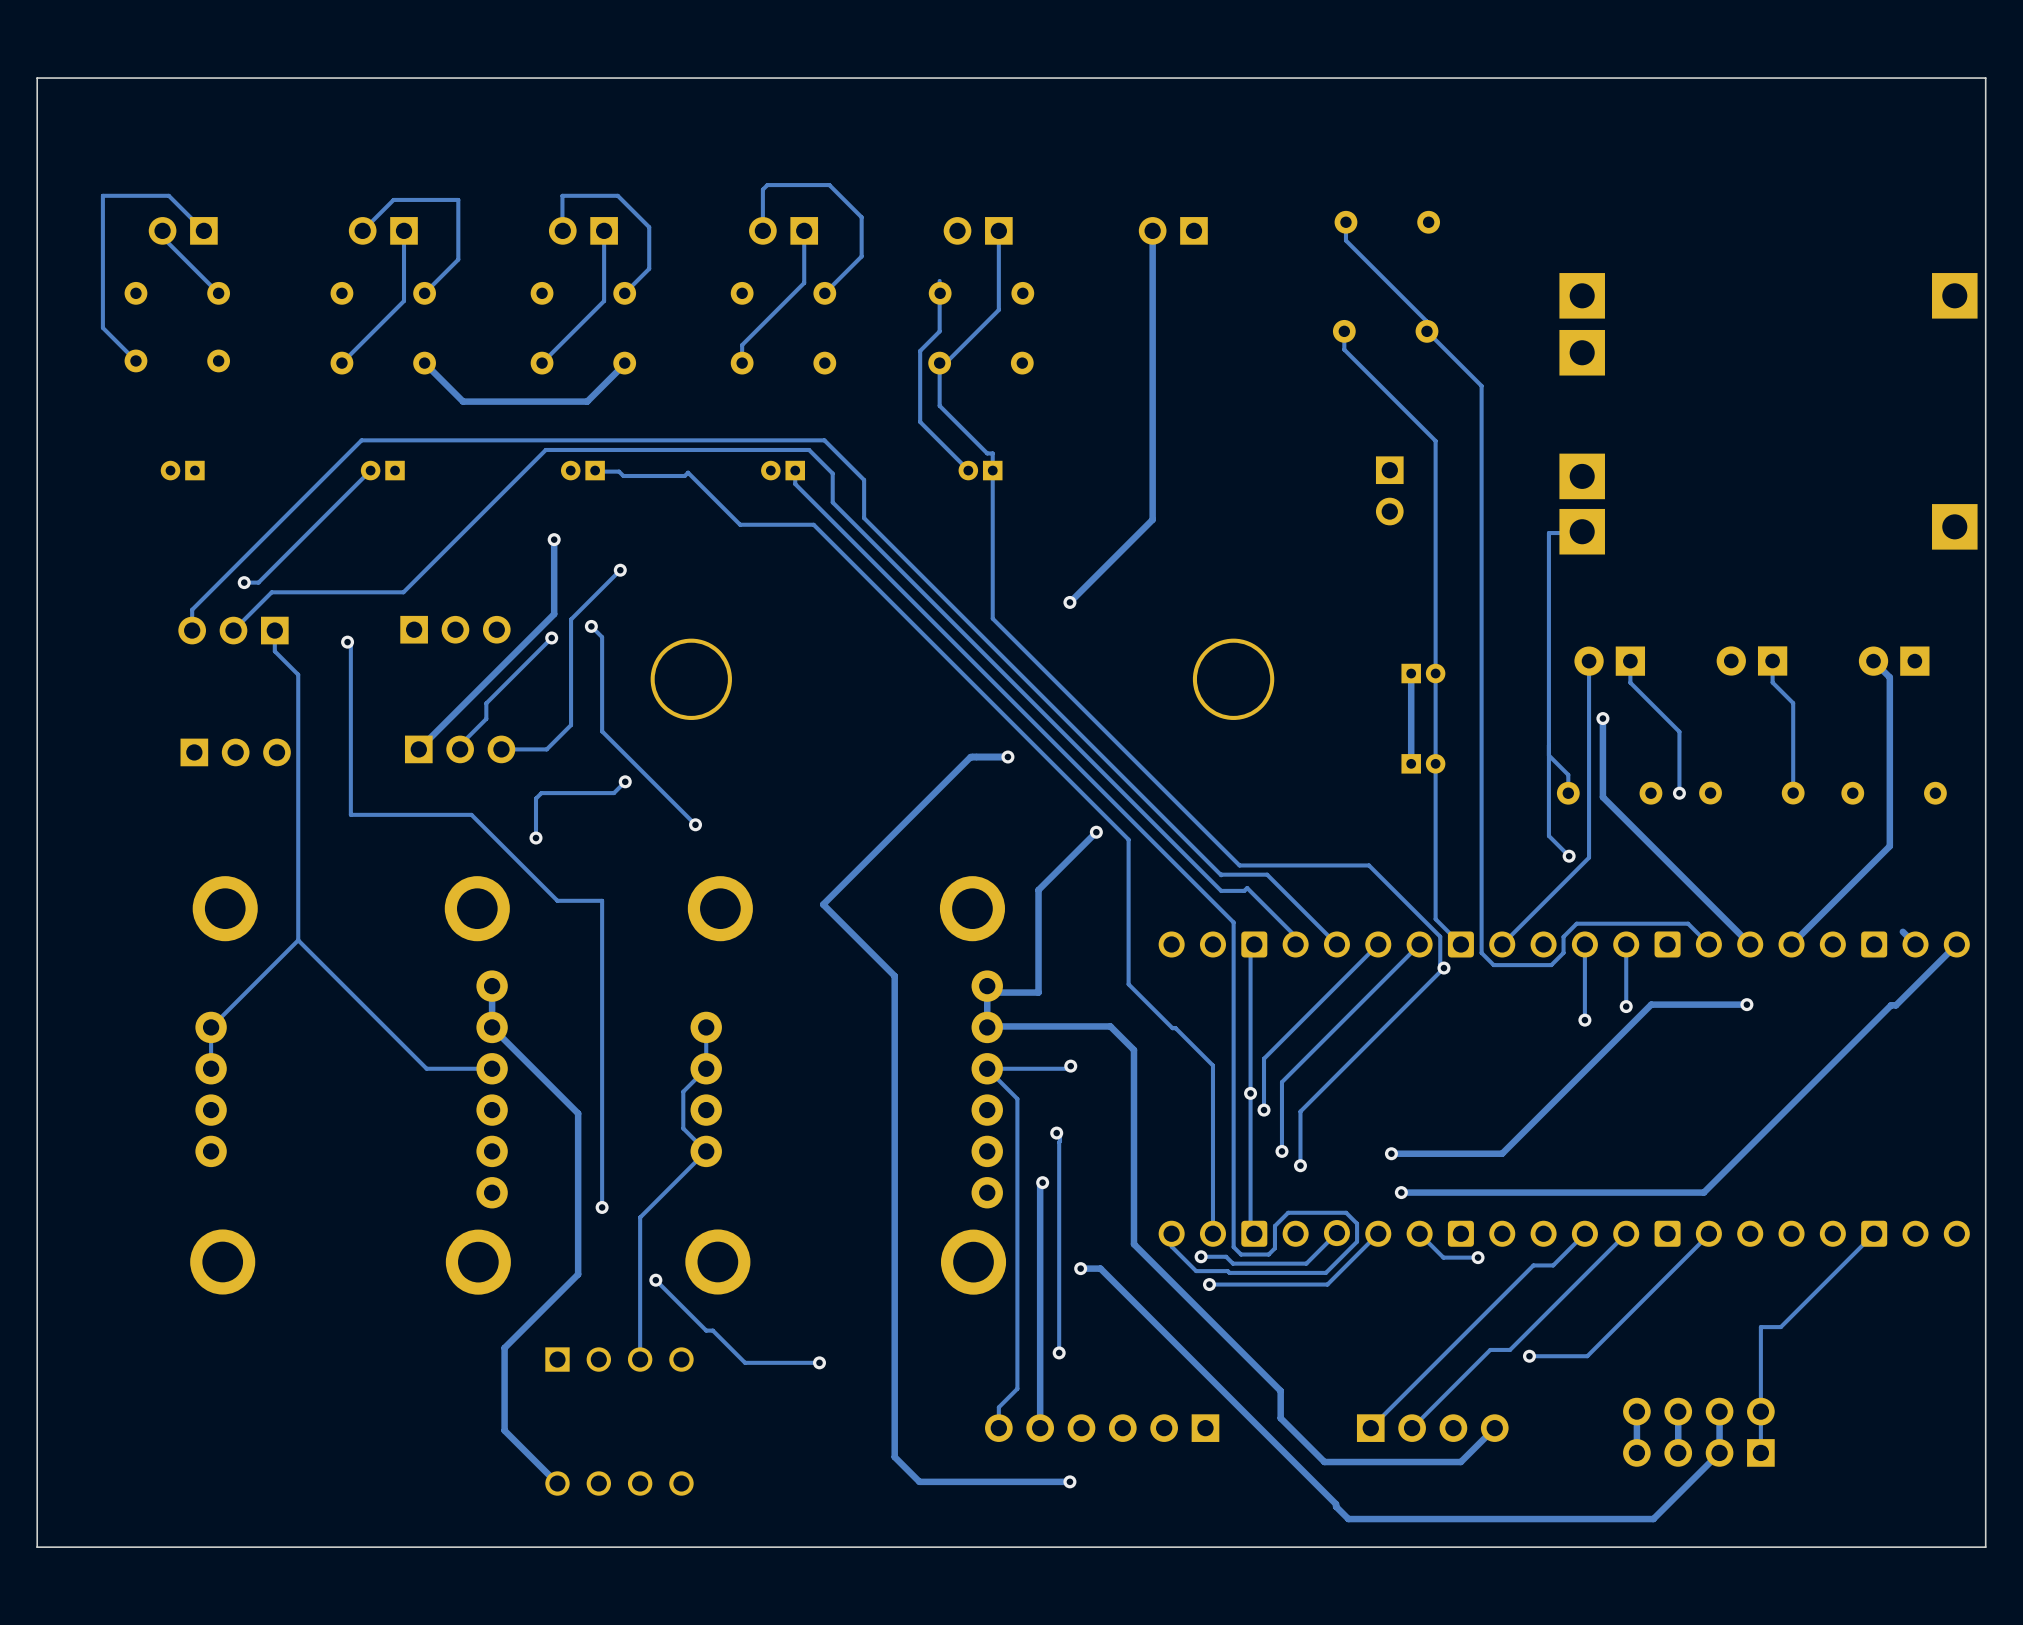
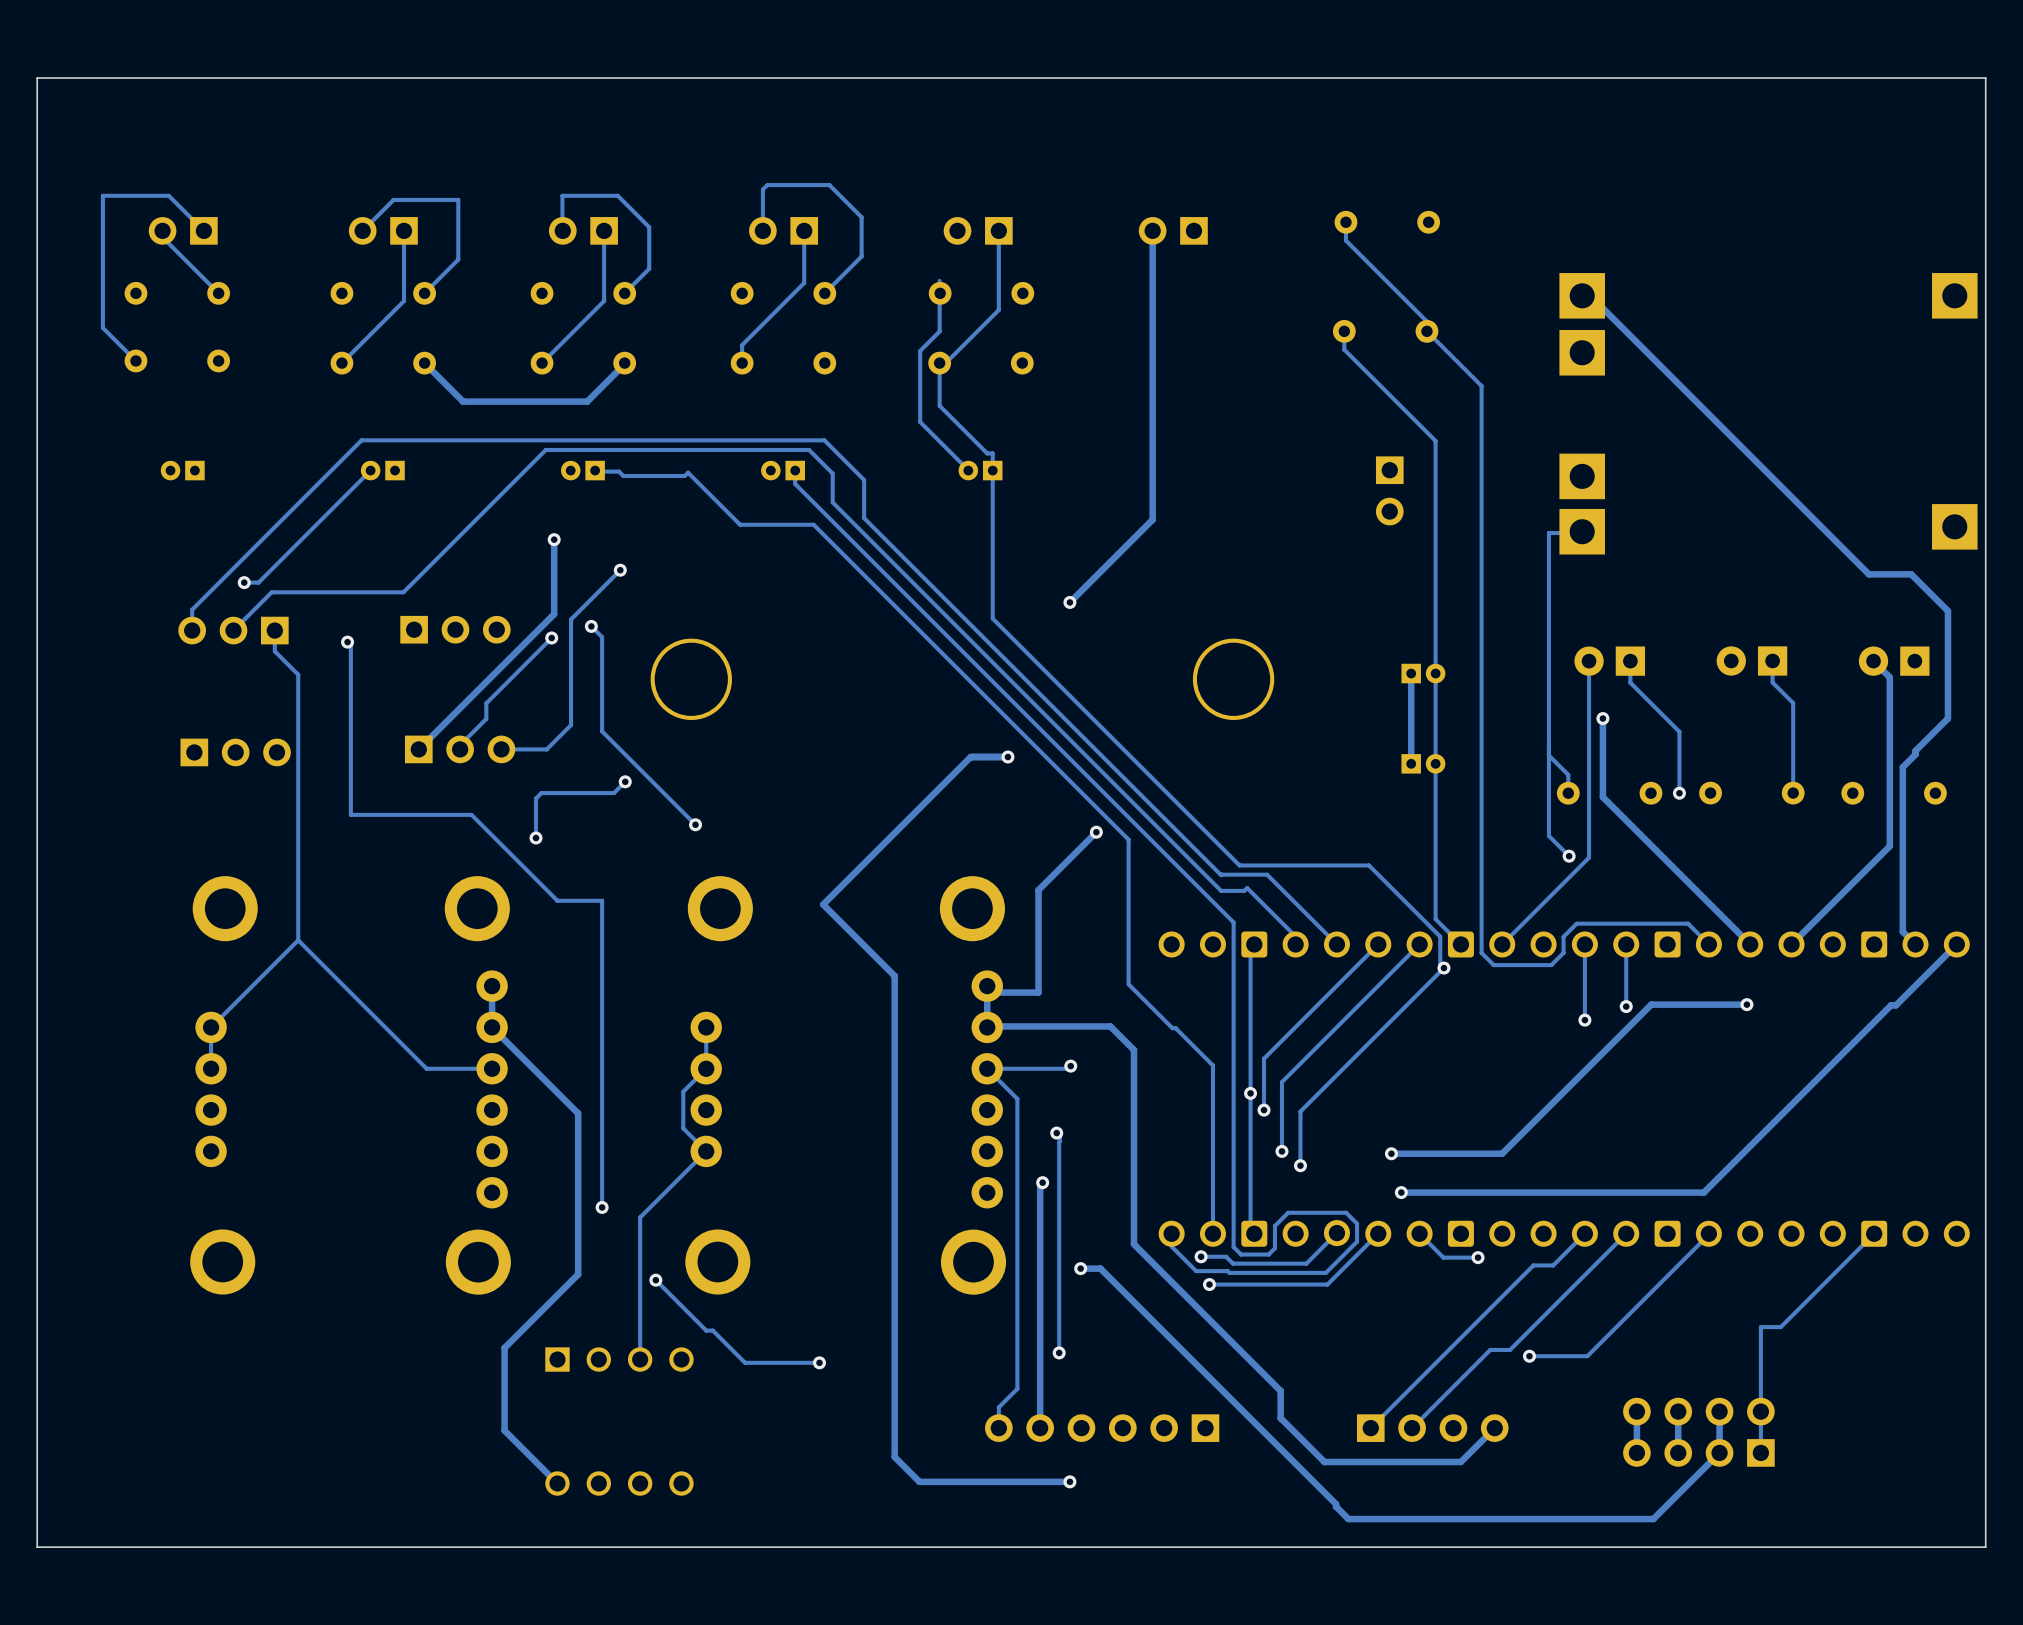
track: none -> (1587, 292) (1868, 574) (1911, 574) (1947, 611) (1947, 718) (1915, 750) (1915, 754) (1902, 767) (1902, 931)

